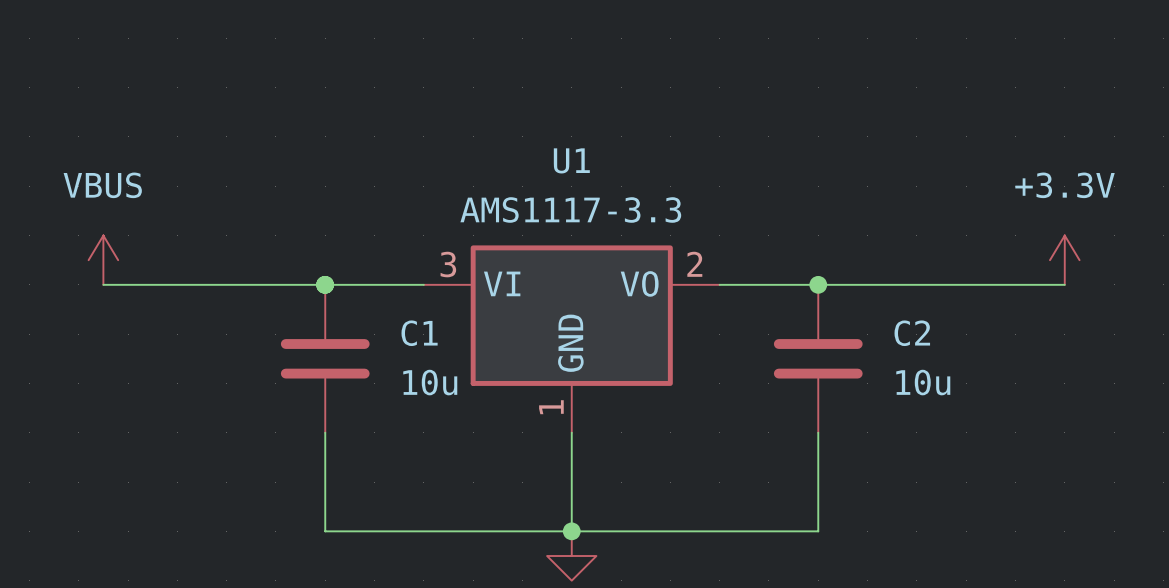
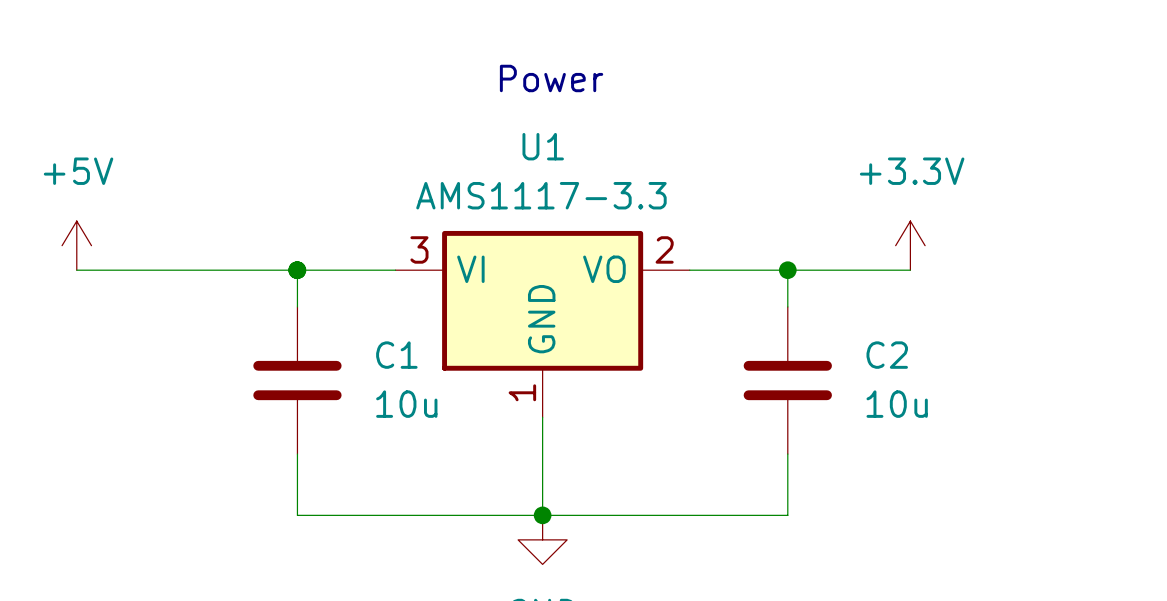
text: none -> Power (551, 78)
power symbol: VBUS (103, 260) -> +5V (76, 245)
power symbol position: +3.3V (1064, 260) -> +3.3V (910, 245)
wire: (941, 284) (1064, 284) -> none
C1 position: (325, 358) -> (297, 380)
C2 position: (818, 358) -> (787, 380)

